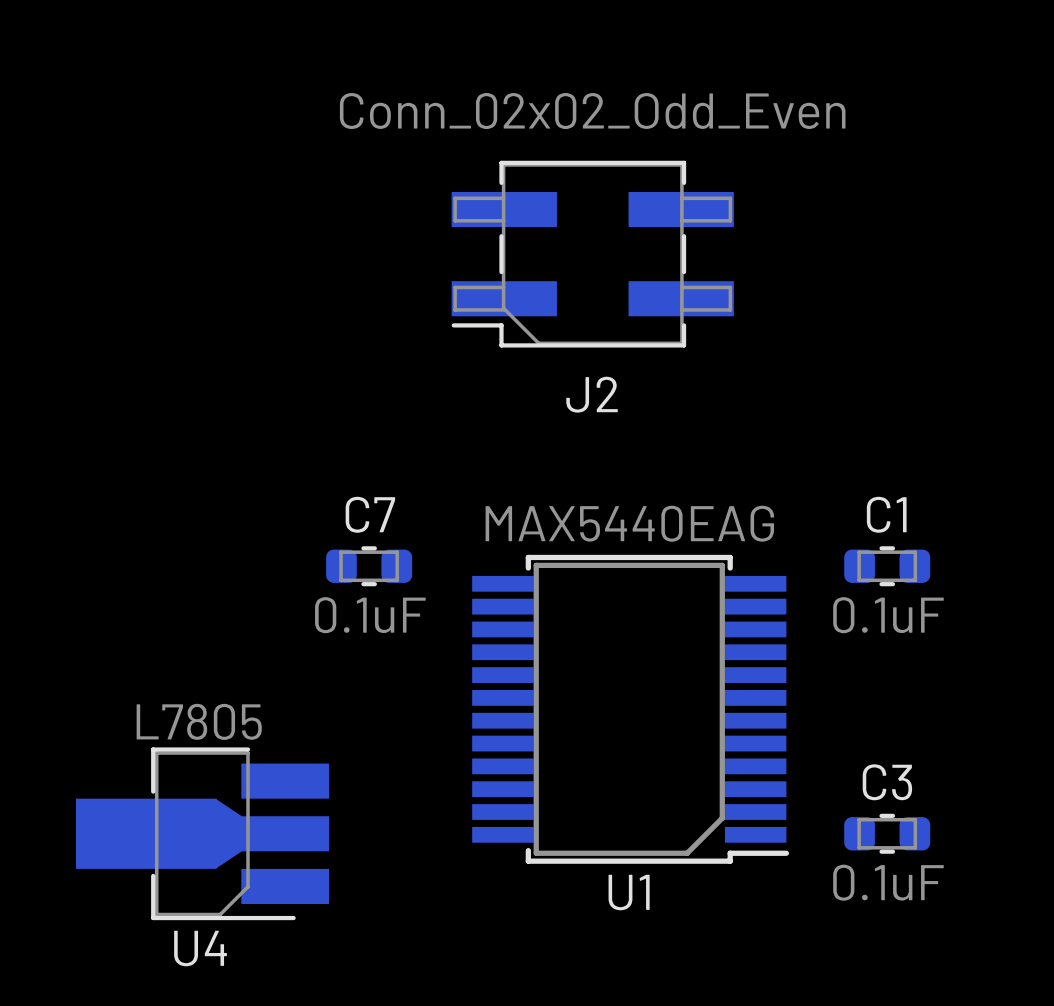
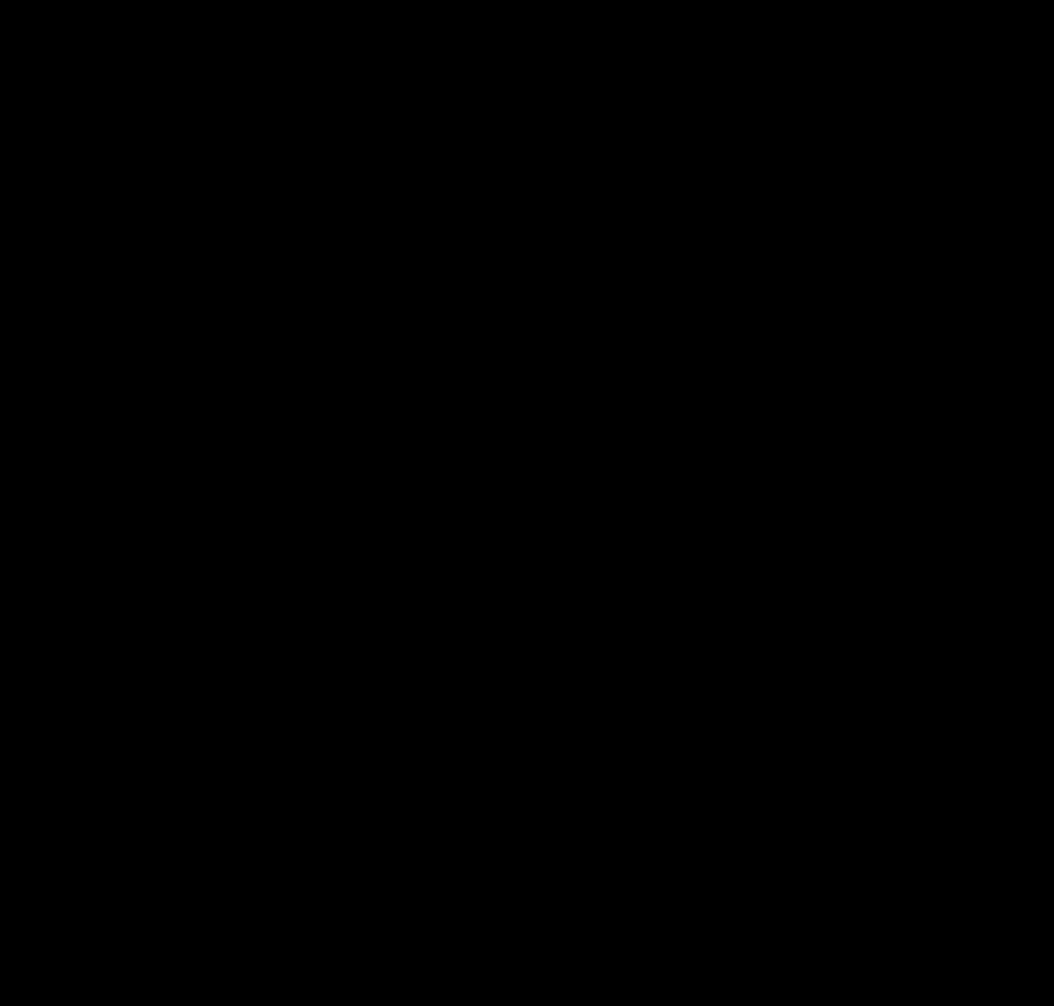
J2: Conn_02x02_Odd_Even (592, 254) -> none
C7: 0.1uF (369, 566) -> none
C1: 0.1uF (887, 566) -> none
U1: MAX5440EAG (630, 709) -> none
U4: L7805 (202, 833) -> none
C3: 0.1uF (887, 833) -> none

